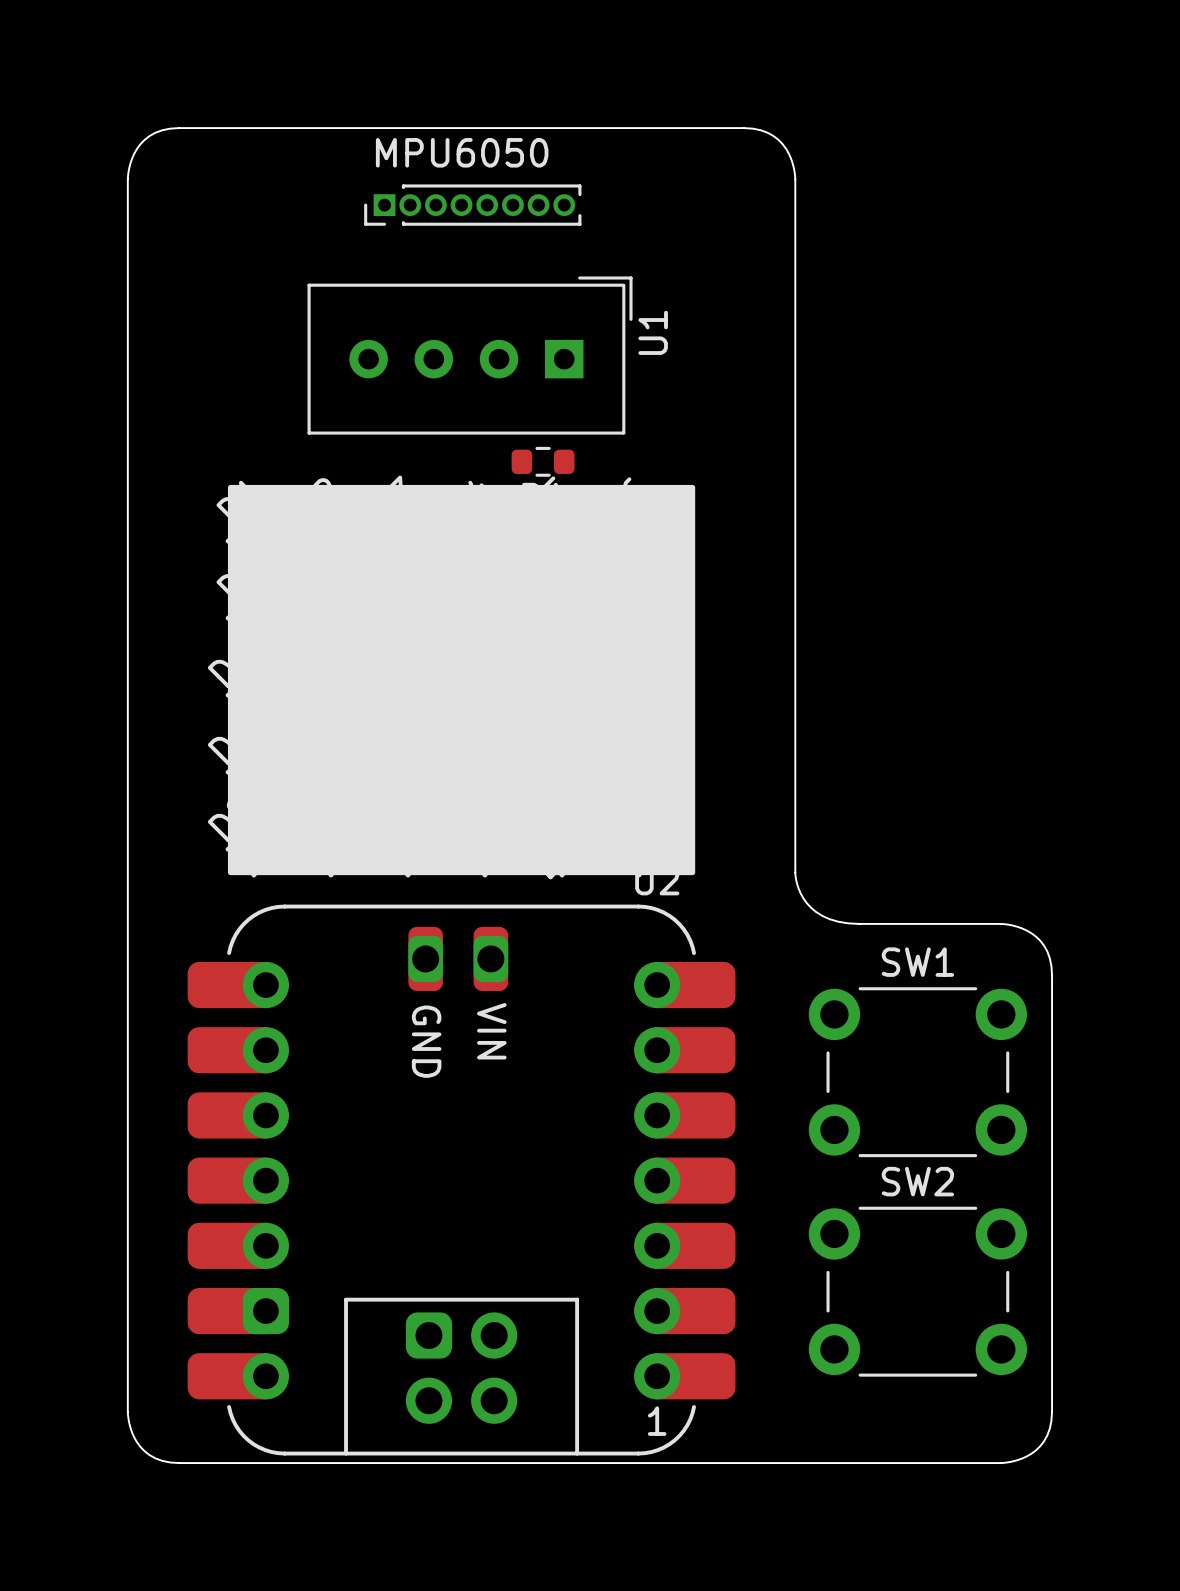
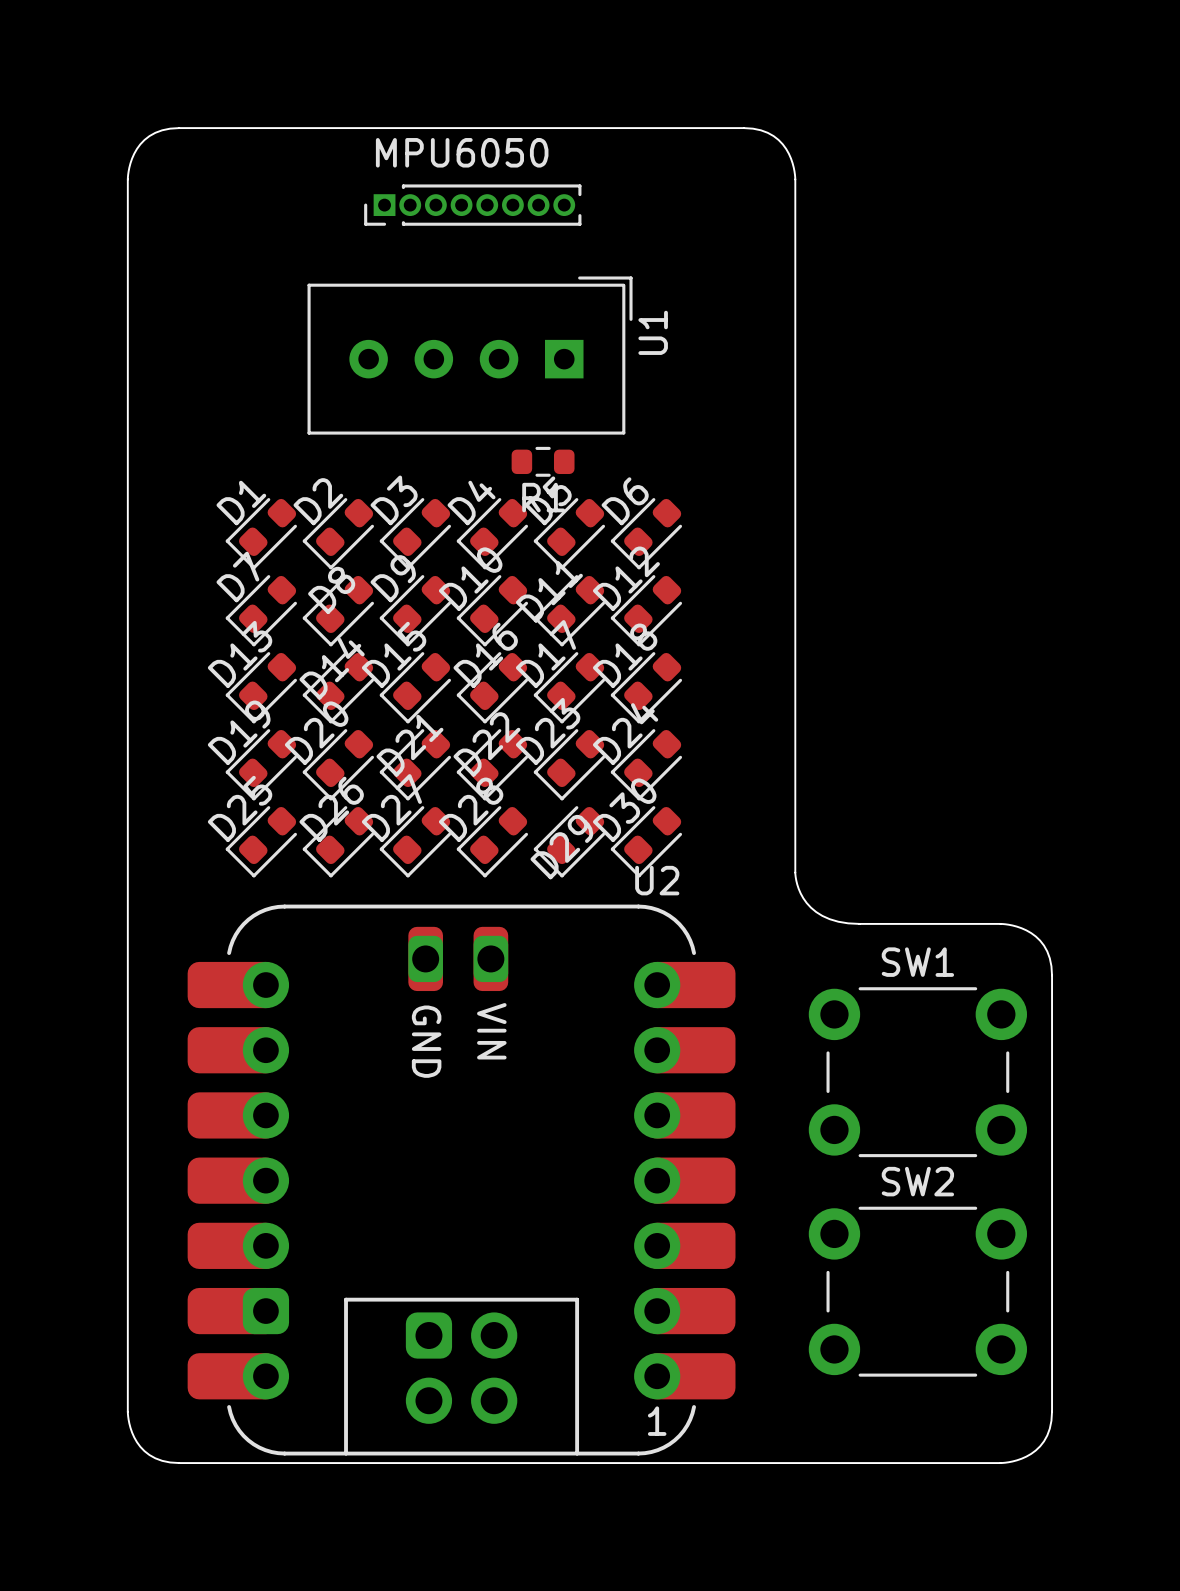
drawing: [227, 484, 696, 876] -> none

